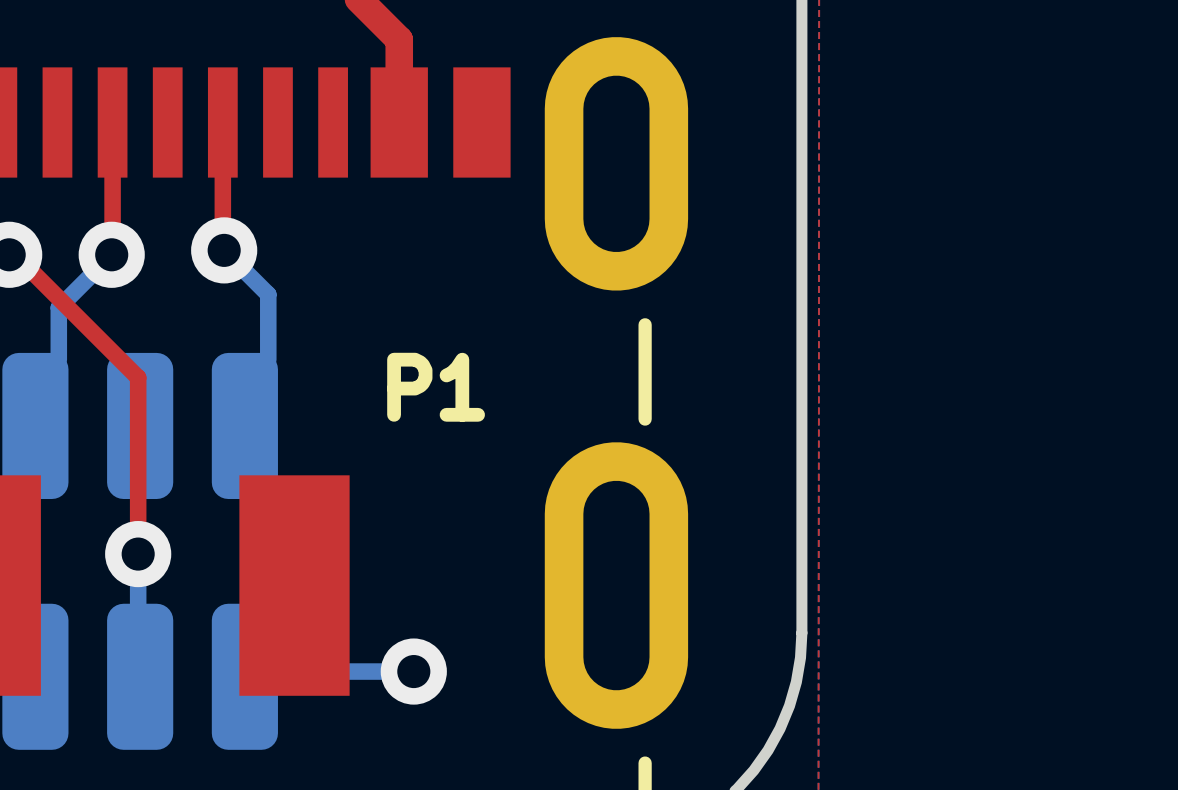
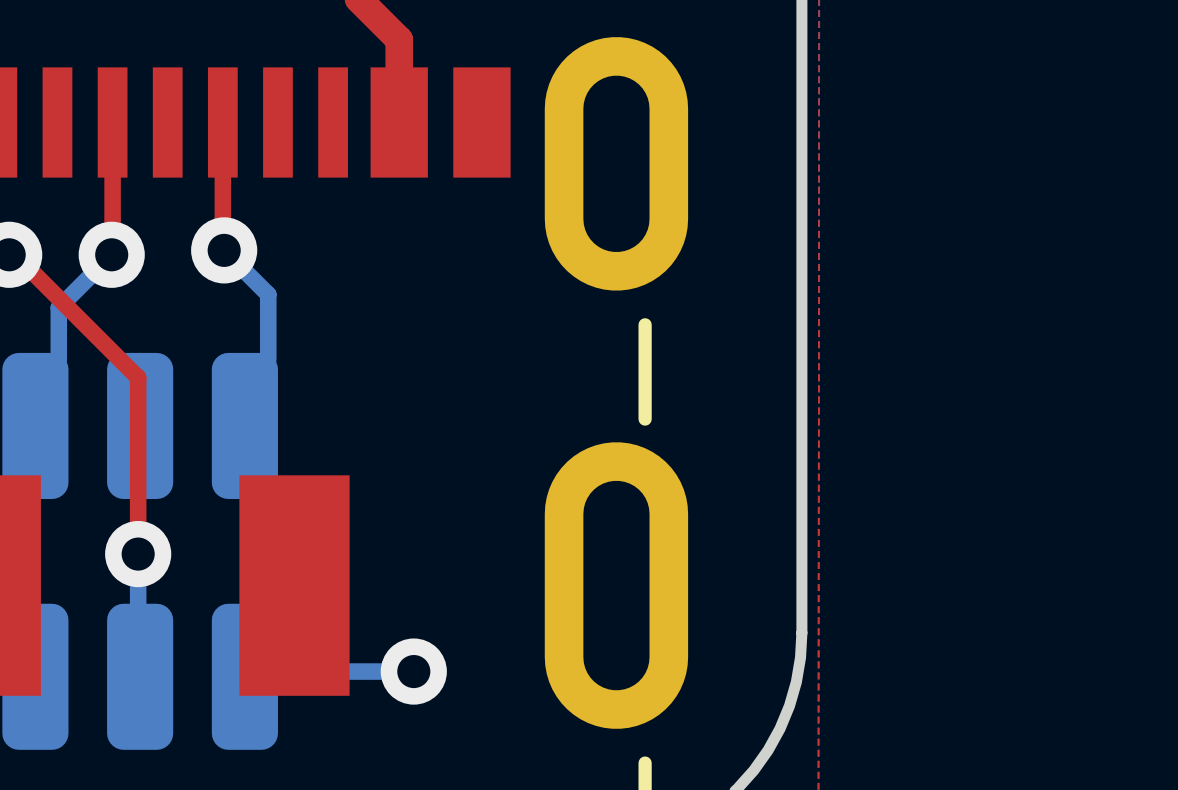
P1 name: P1 (436, 387) -> none

